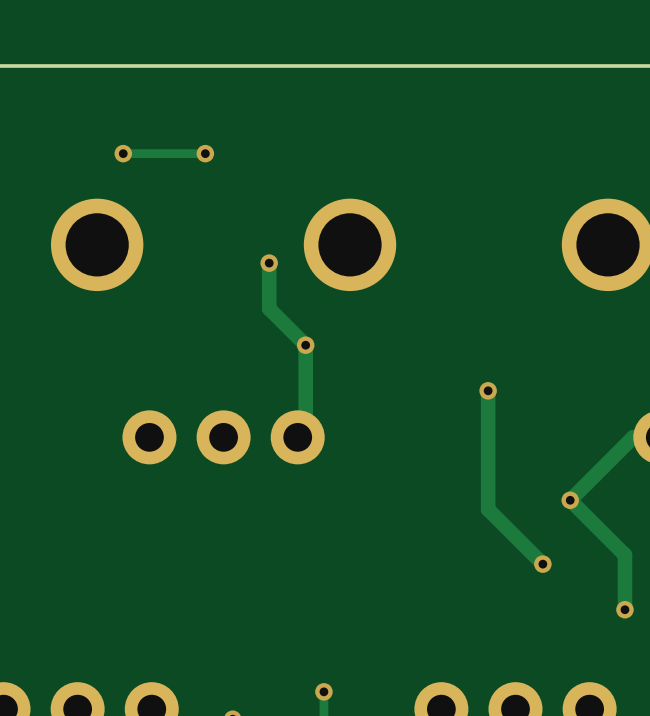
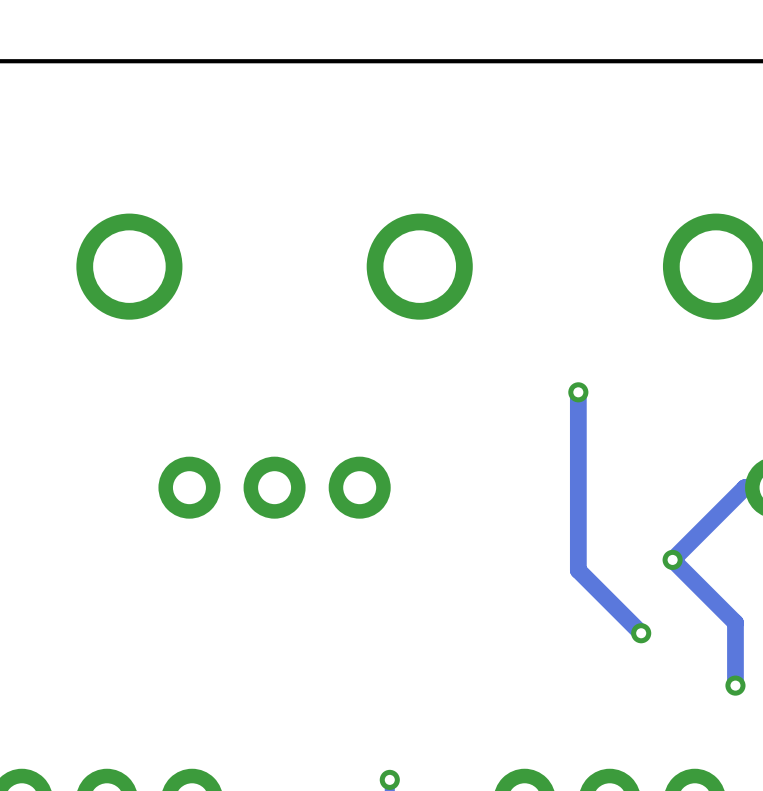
via: (123, 153) -> none
track: (205, 153) (123, 153) -> none
via: (205, 153) -> none
track: (269, 263) (269, 308) (305, 345) (305, 429) (297, 437) -> none
via: (269, 263) -> none
via: (305, 345) -> none
track: none -> (578, 392) (578, 434)
via position: (488, 390) -> (578, 392)

